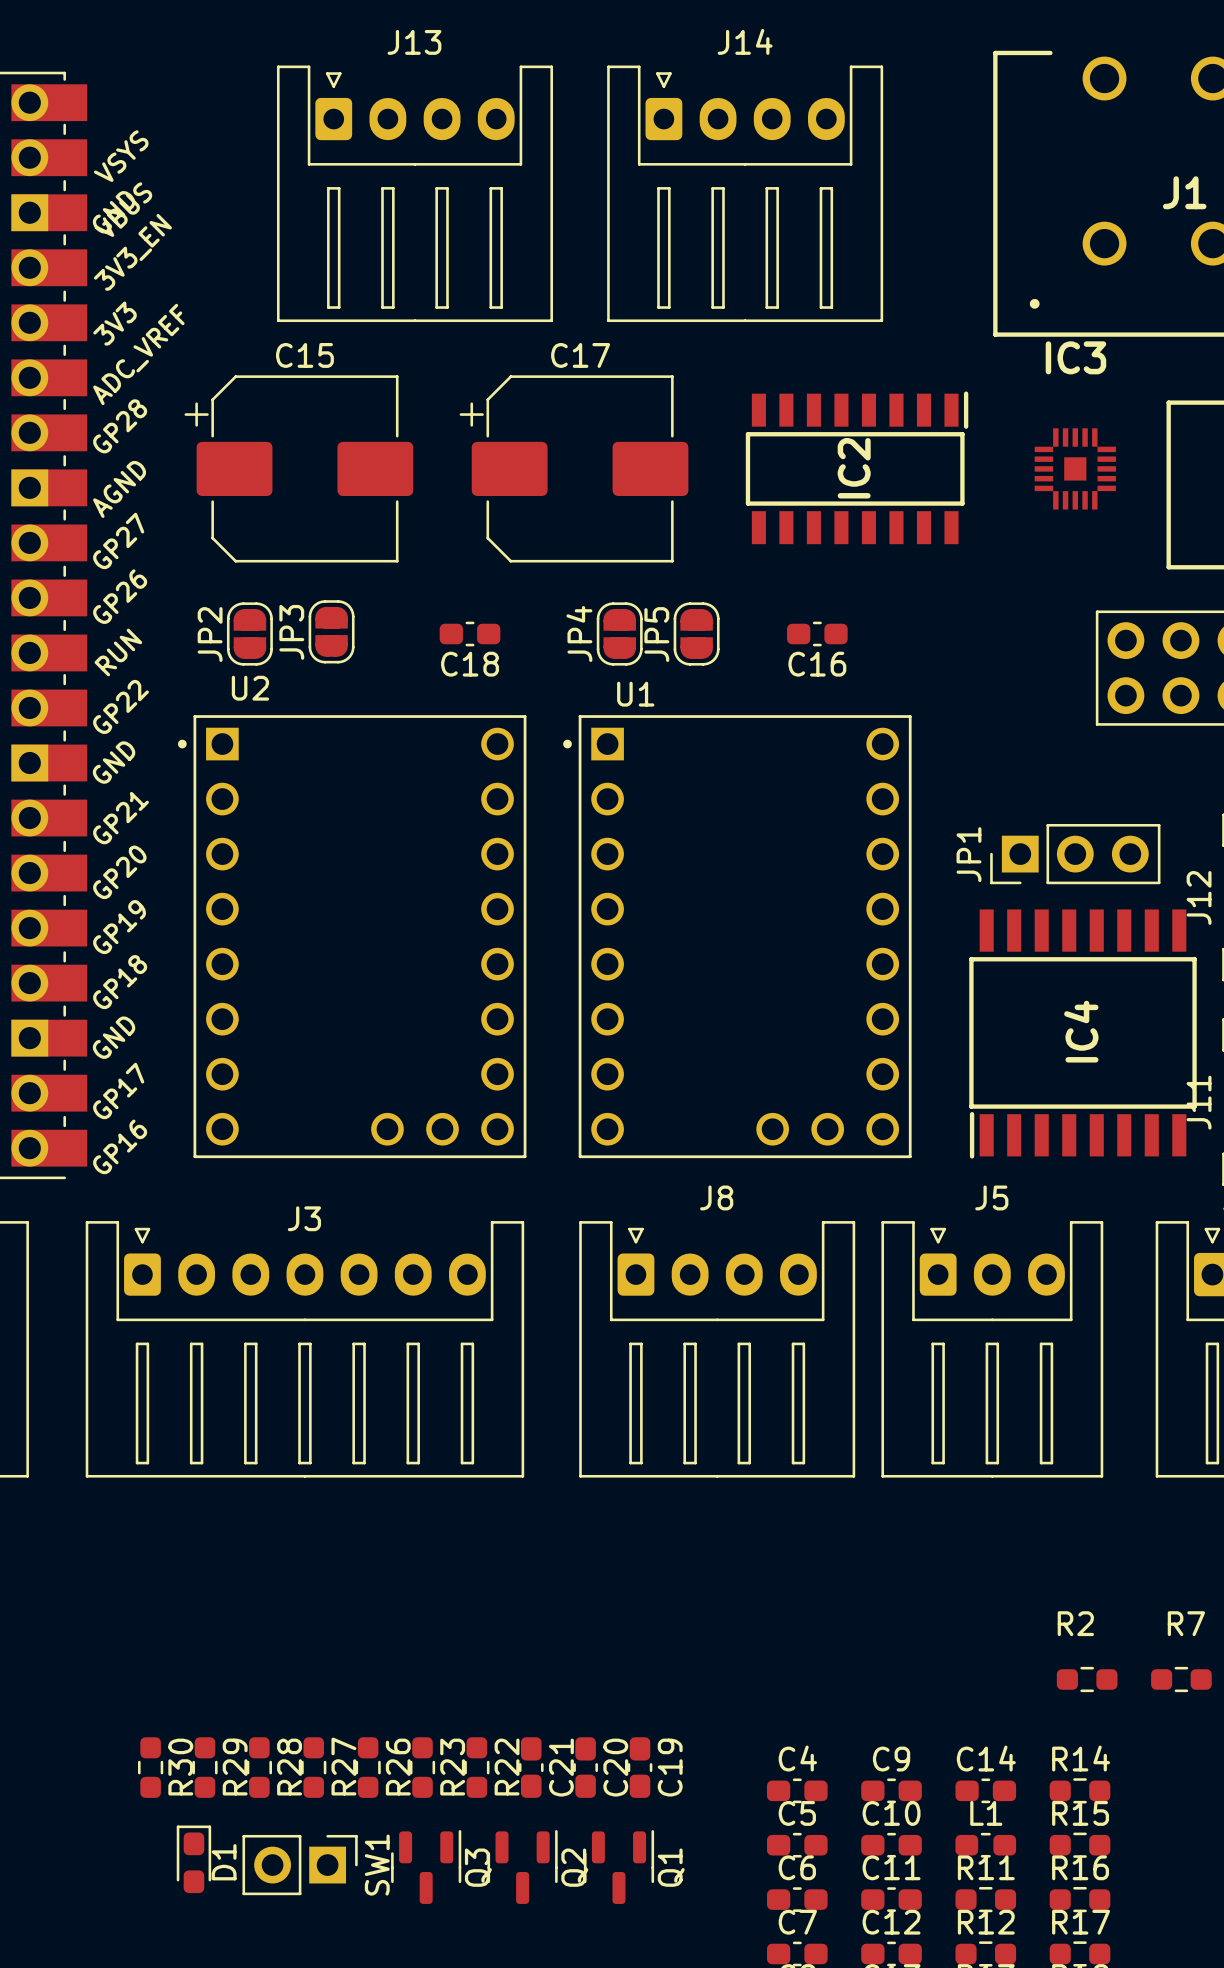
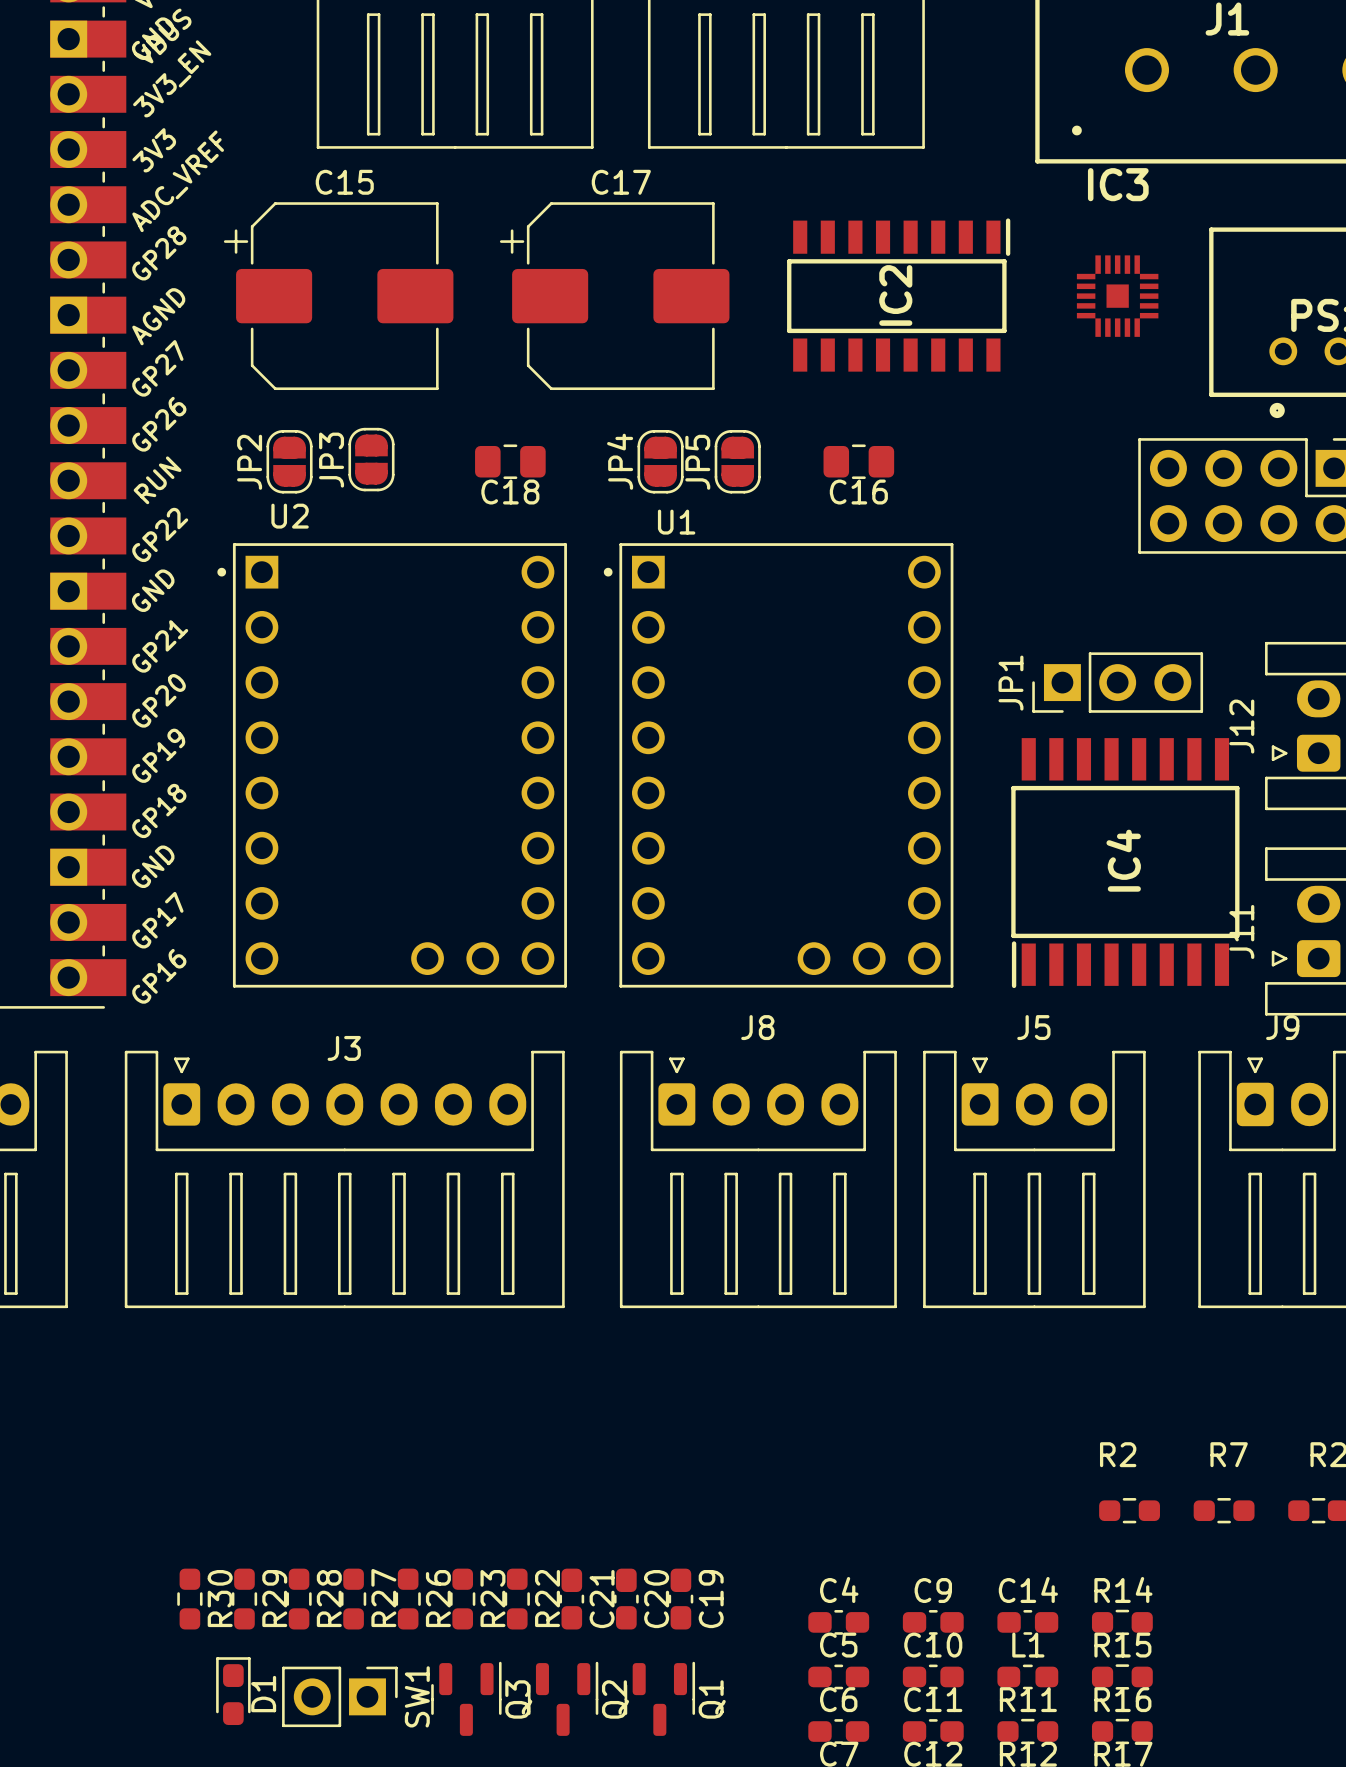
C18 footprint: [439, 621, 501, 647] -> [475, 444, 546, 480]
C16 footprint: [787, 621, 848, 647] -> [823, 444, 895, 480]

